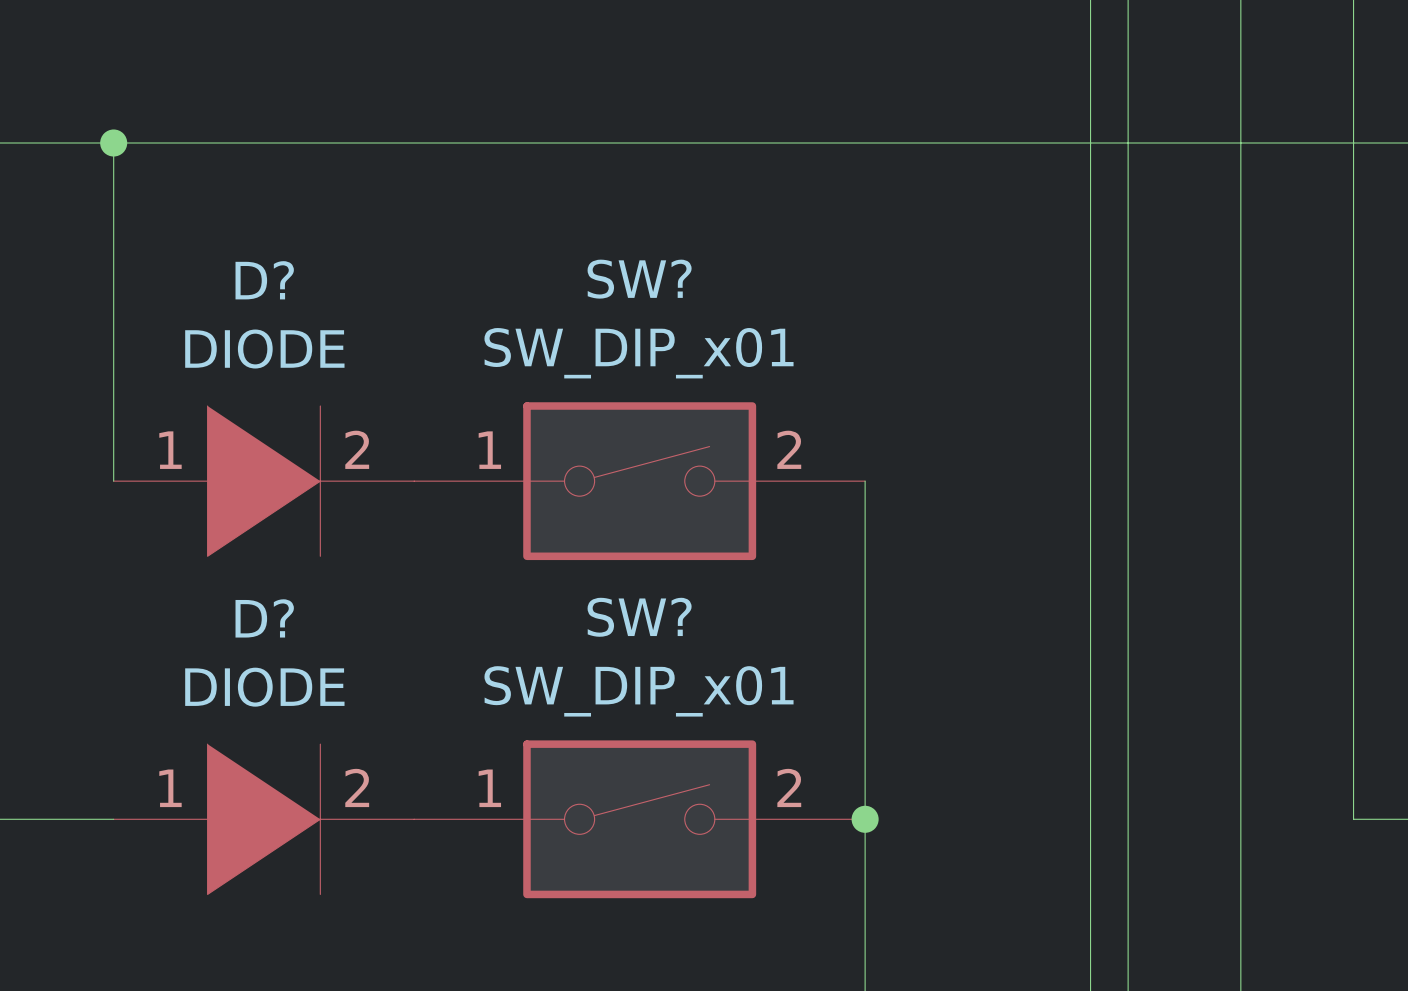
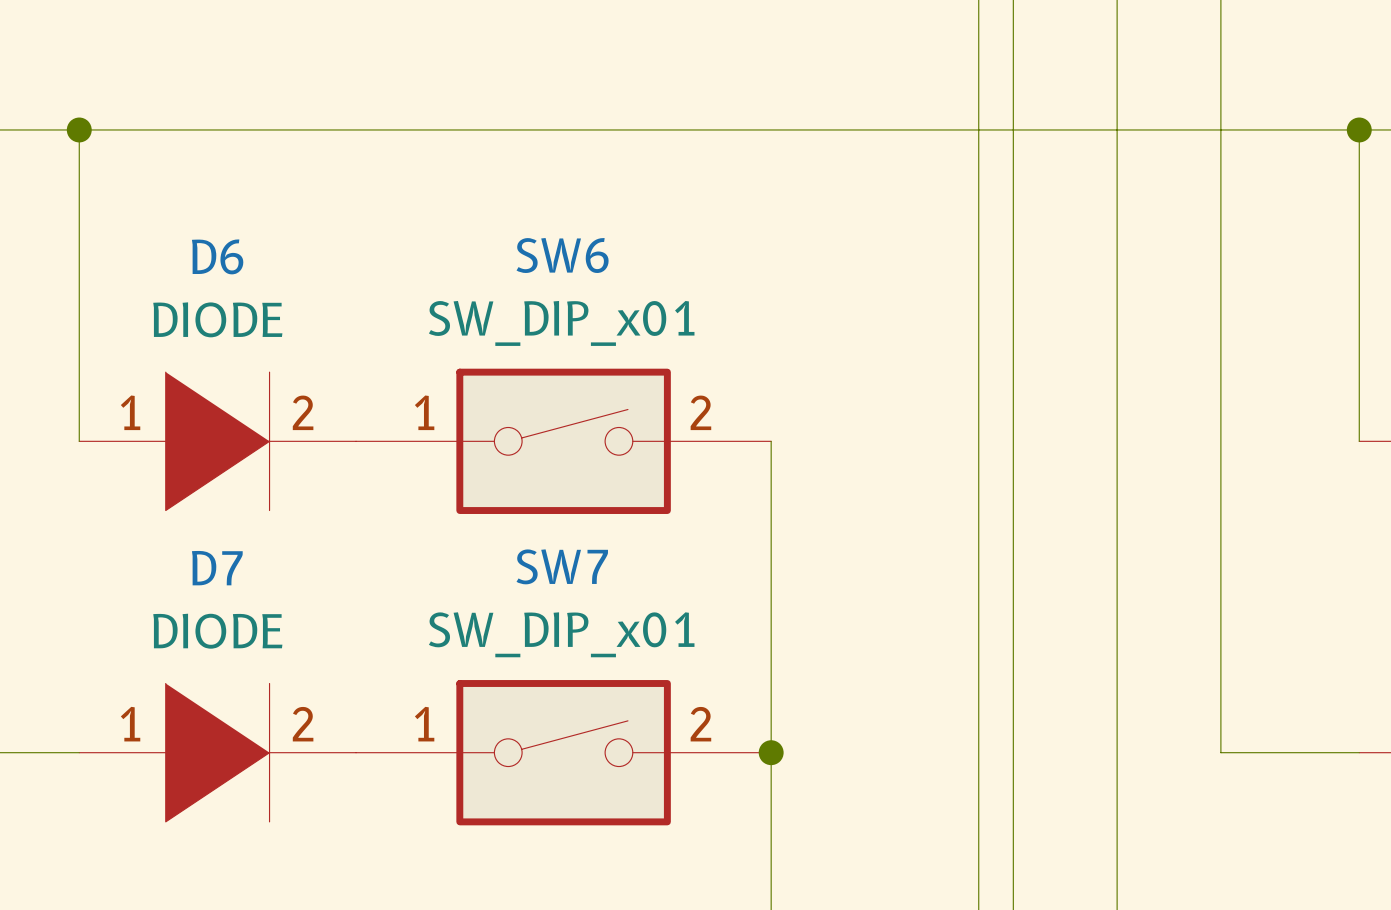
SW? name: SW? (639, 279) -> SW6 (562, 255)
D? name: D? (264, 280) -> D6 (217, 256)
SW? name: SW? (639, 617) -> SW7 (562, 566)
D? name: D? (264, 618) -> D7 (217, 568)

